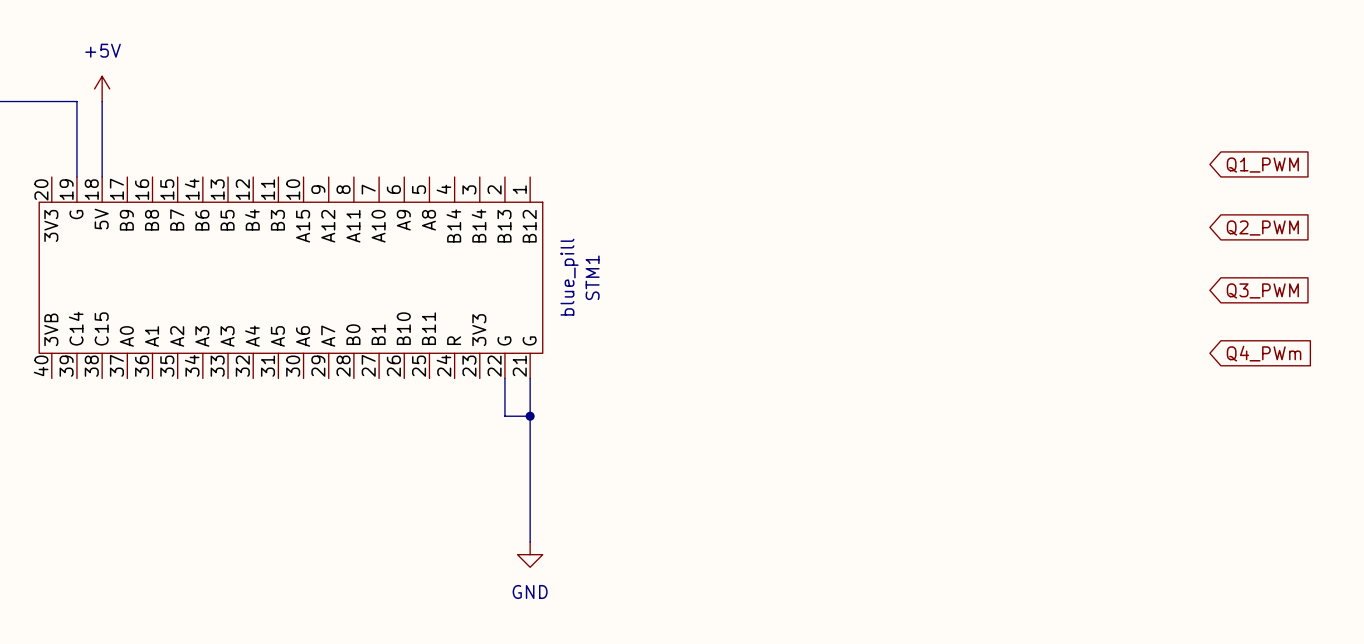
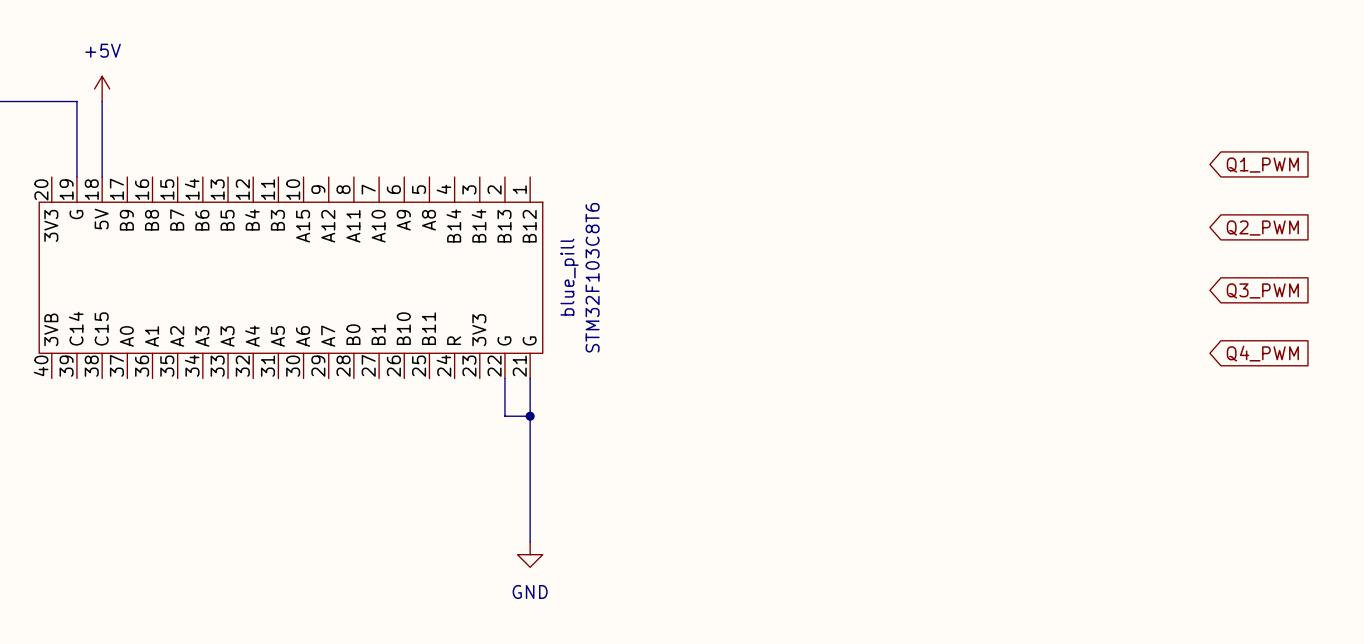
STM1 name: STM1 (592, 277) -> STM32F103C8T6 (592, 277)
global label: Q4_PWm (1264, 353) -> Q4_PWM (1262, 353)

